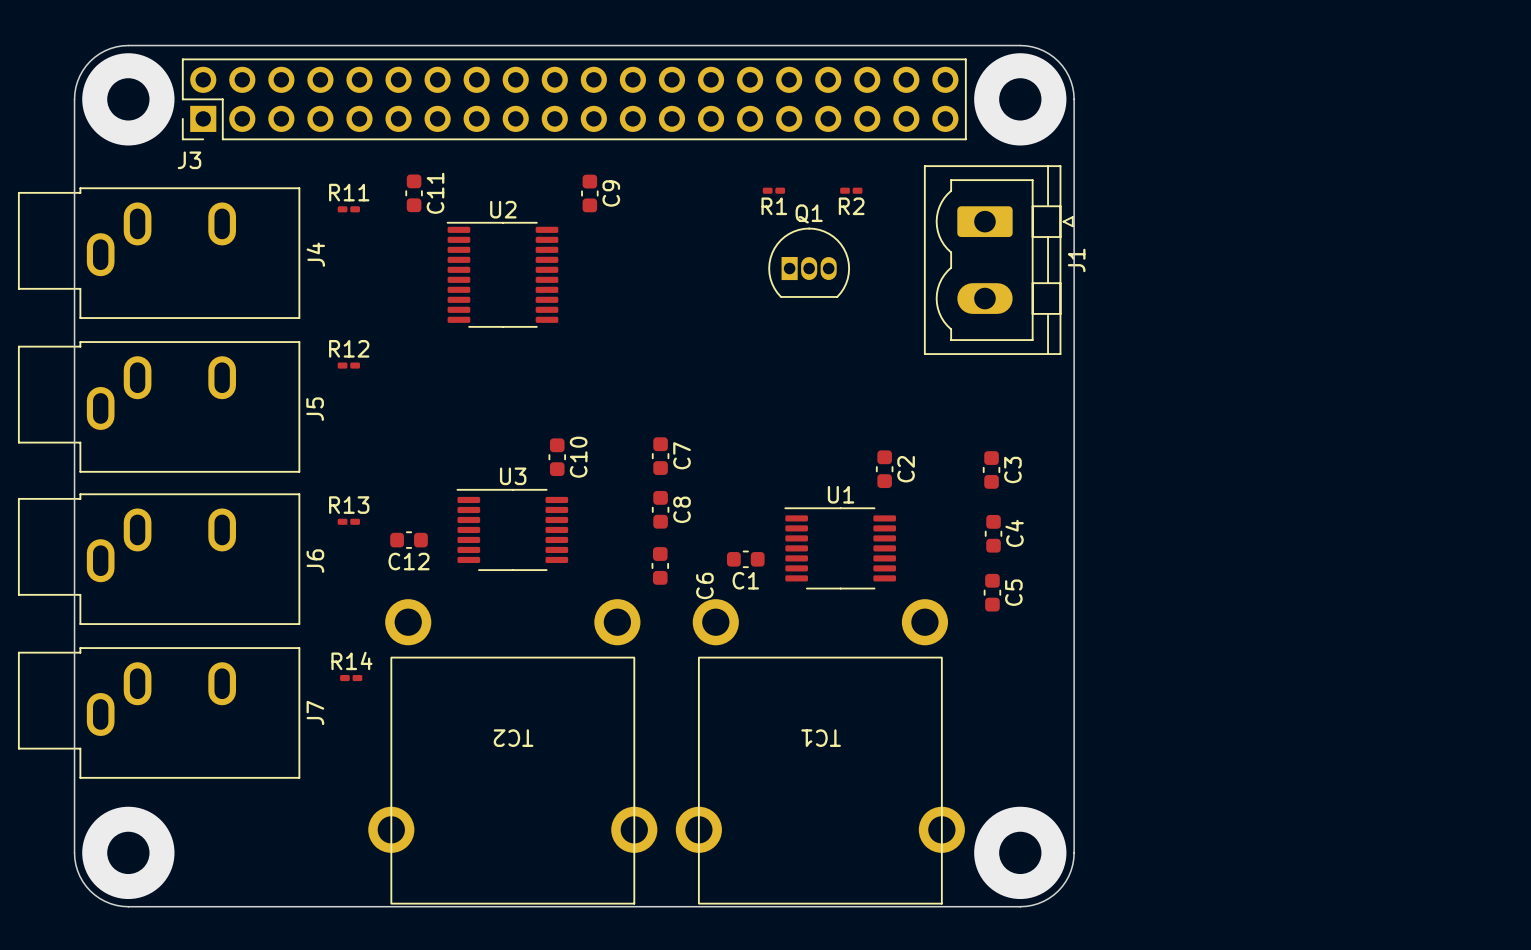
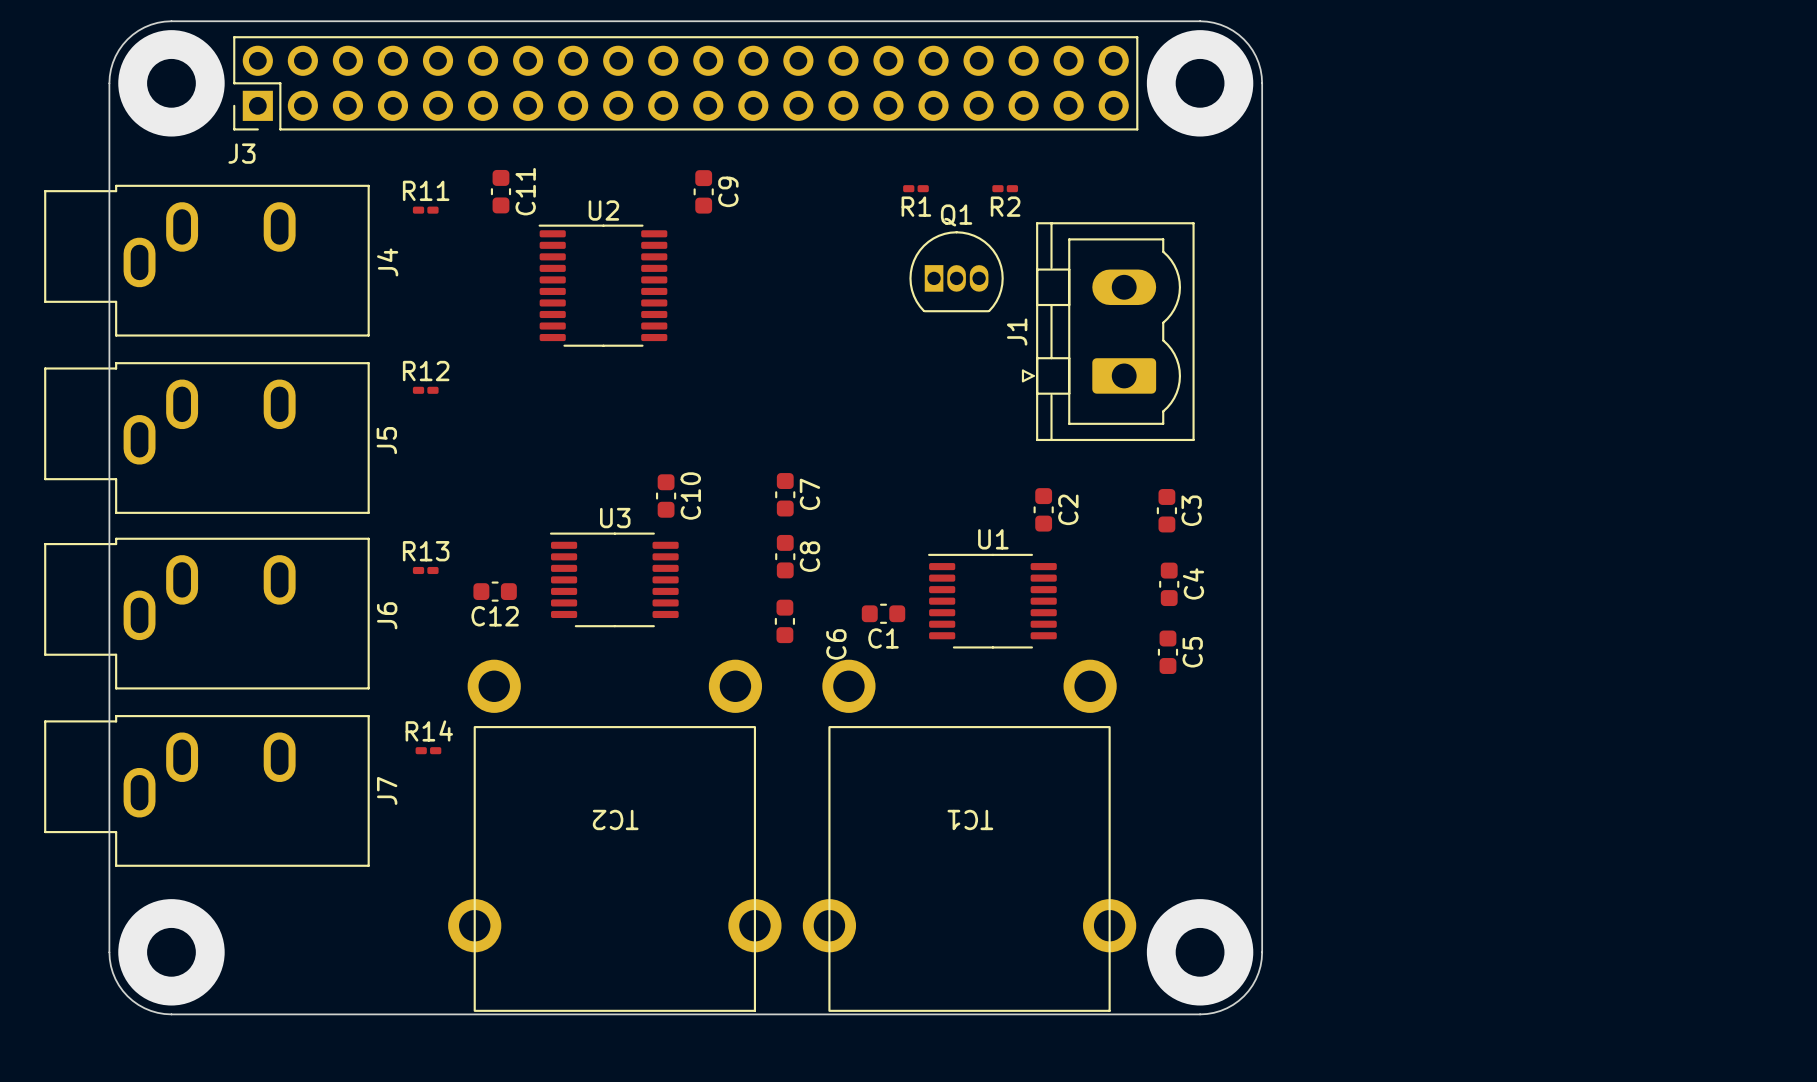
J1 footprint: [923, 165, 1074, 355] -> [1021, 222, 1195, 442]
J1 name position: J1 (1076, 260) -> J1 (1017, 332)

